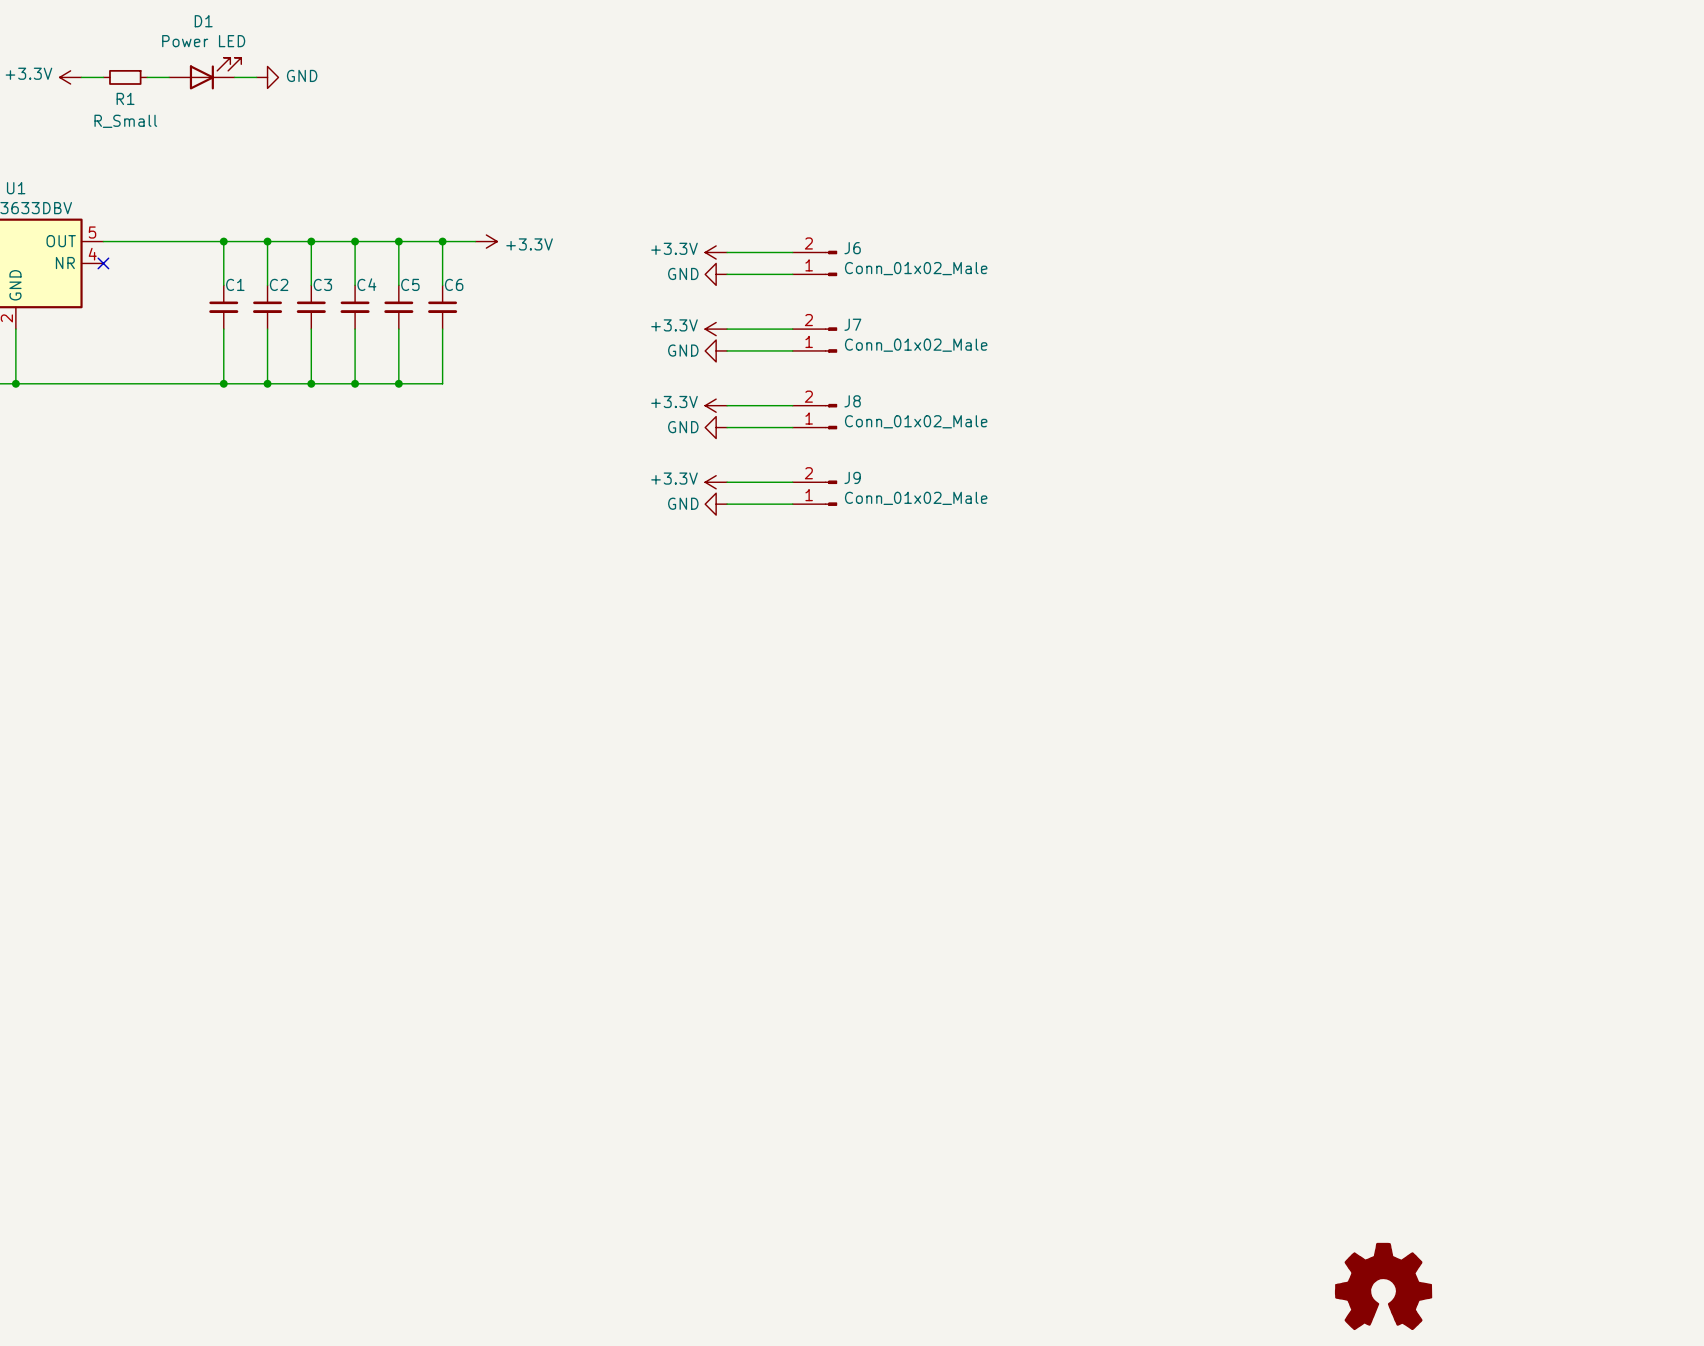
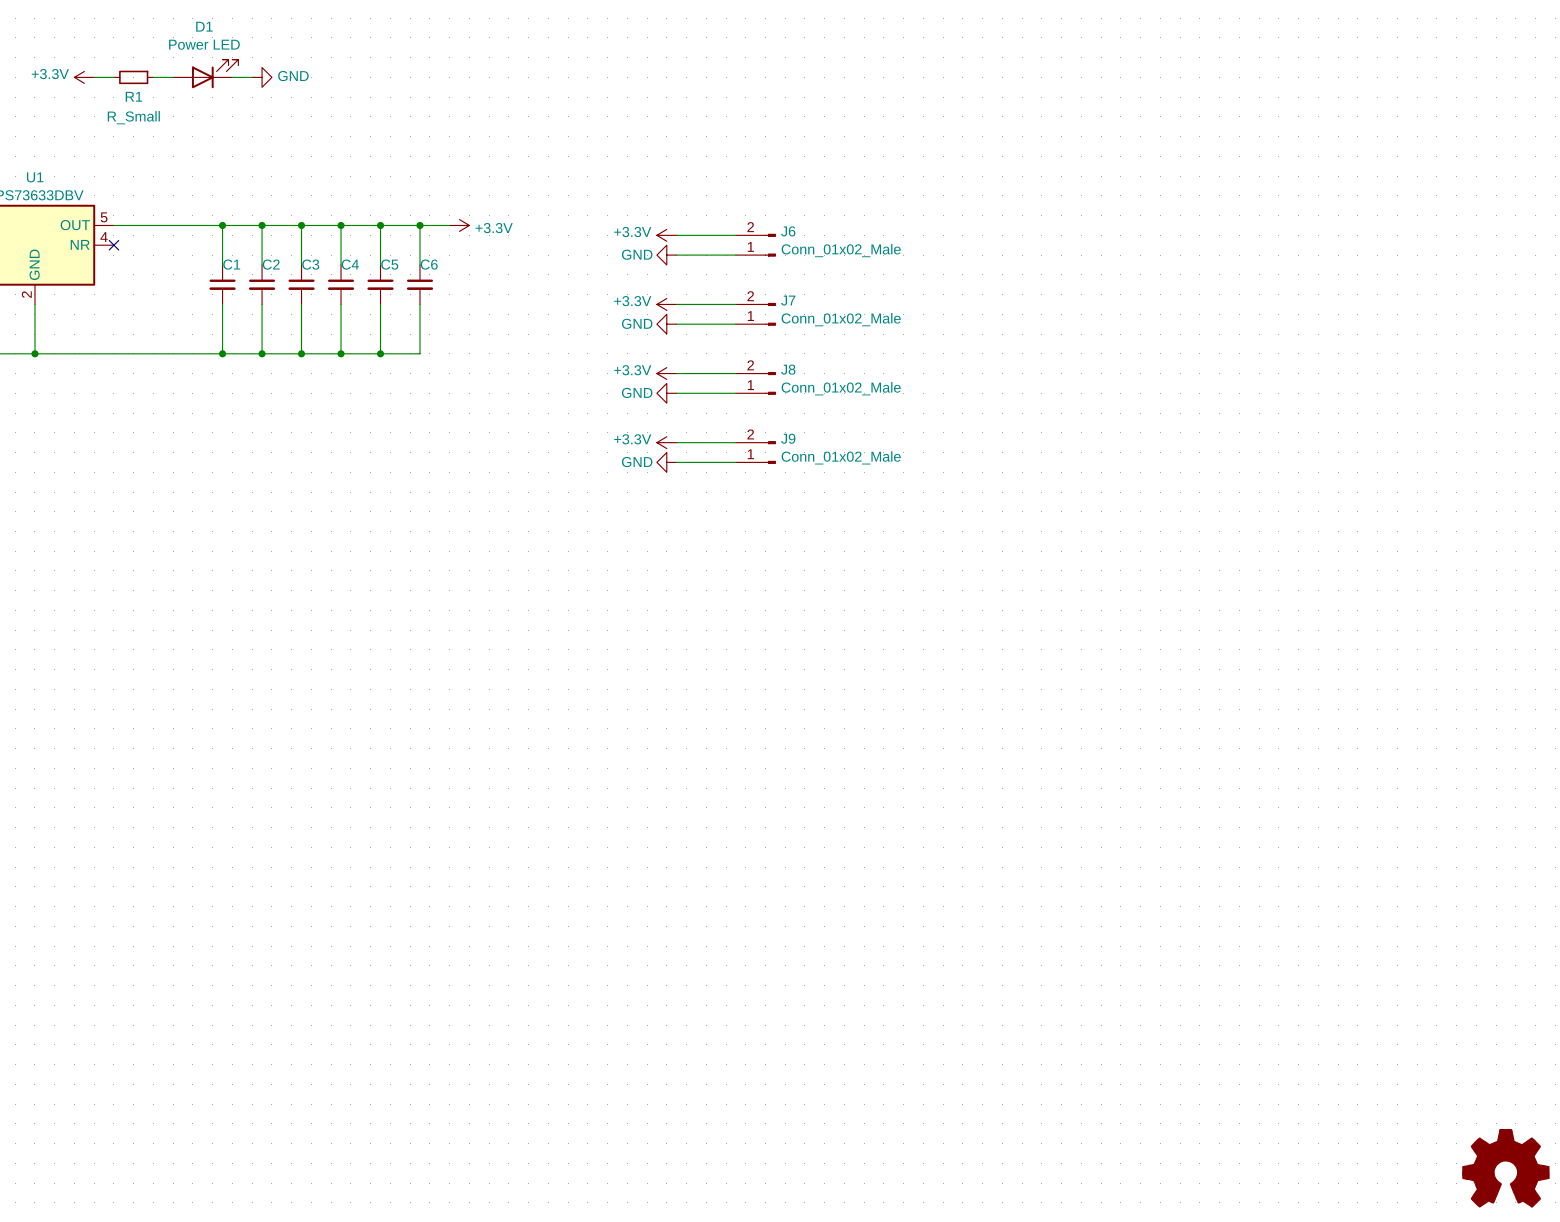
power symbol: (1383, 1286) -> none
power symbol: none -> (1505, 1168)

